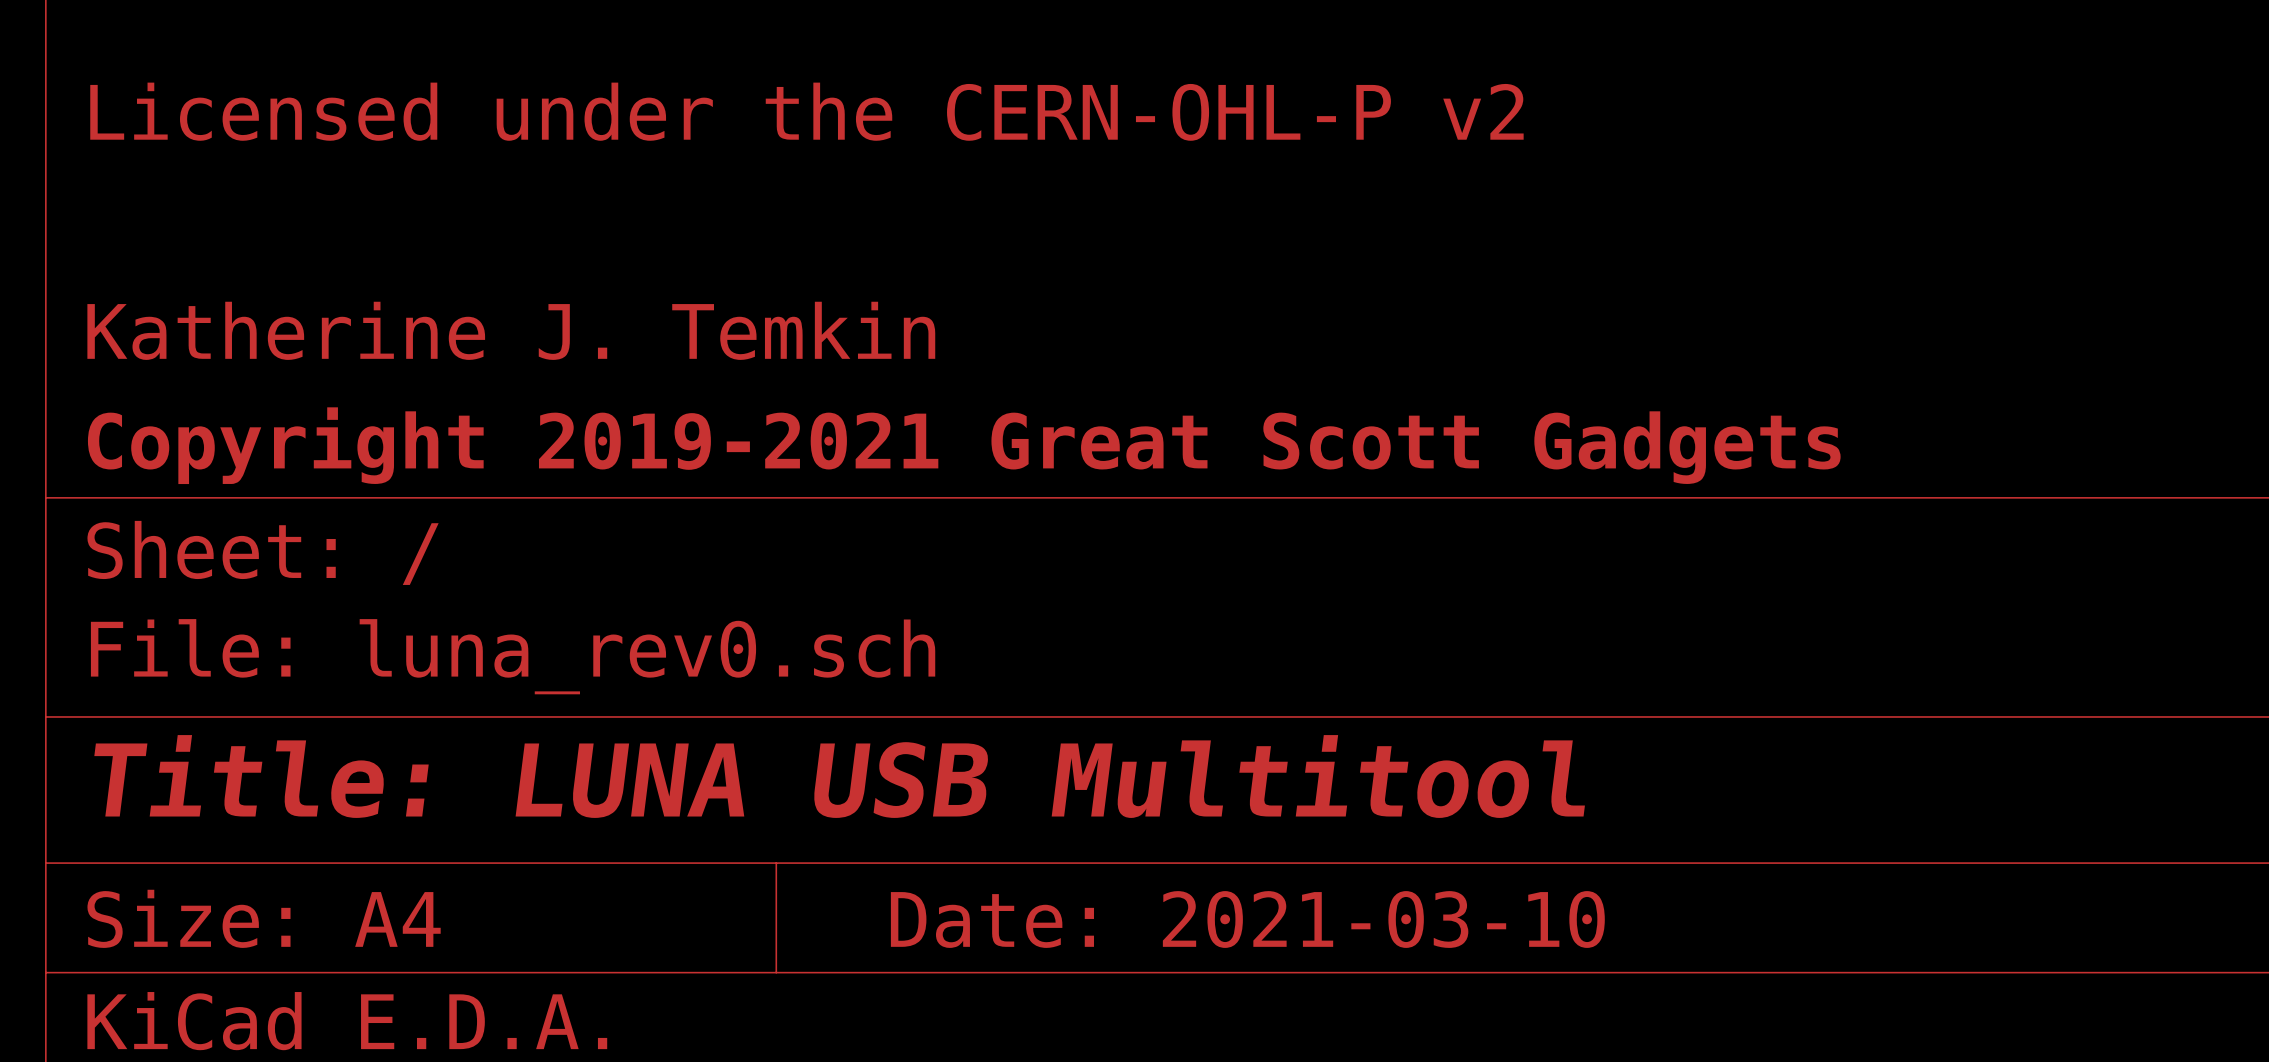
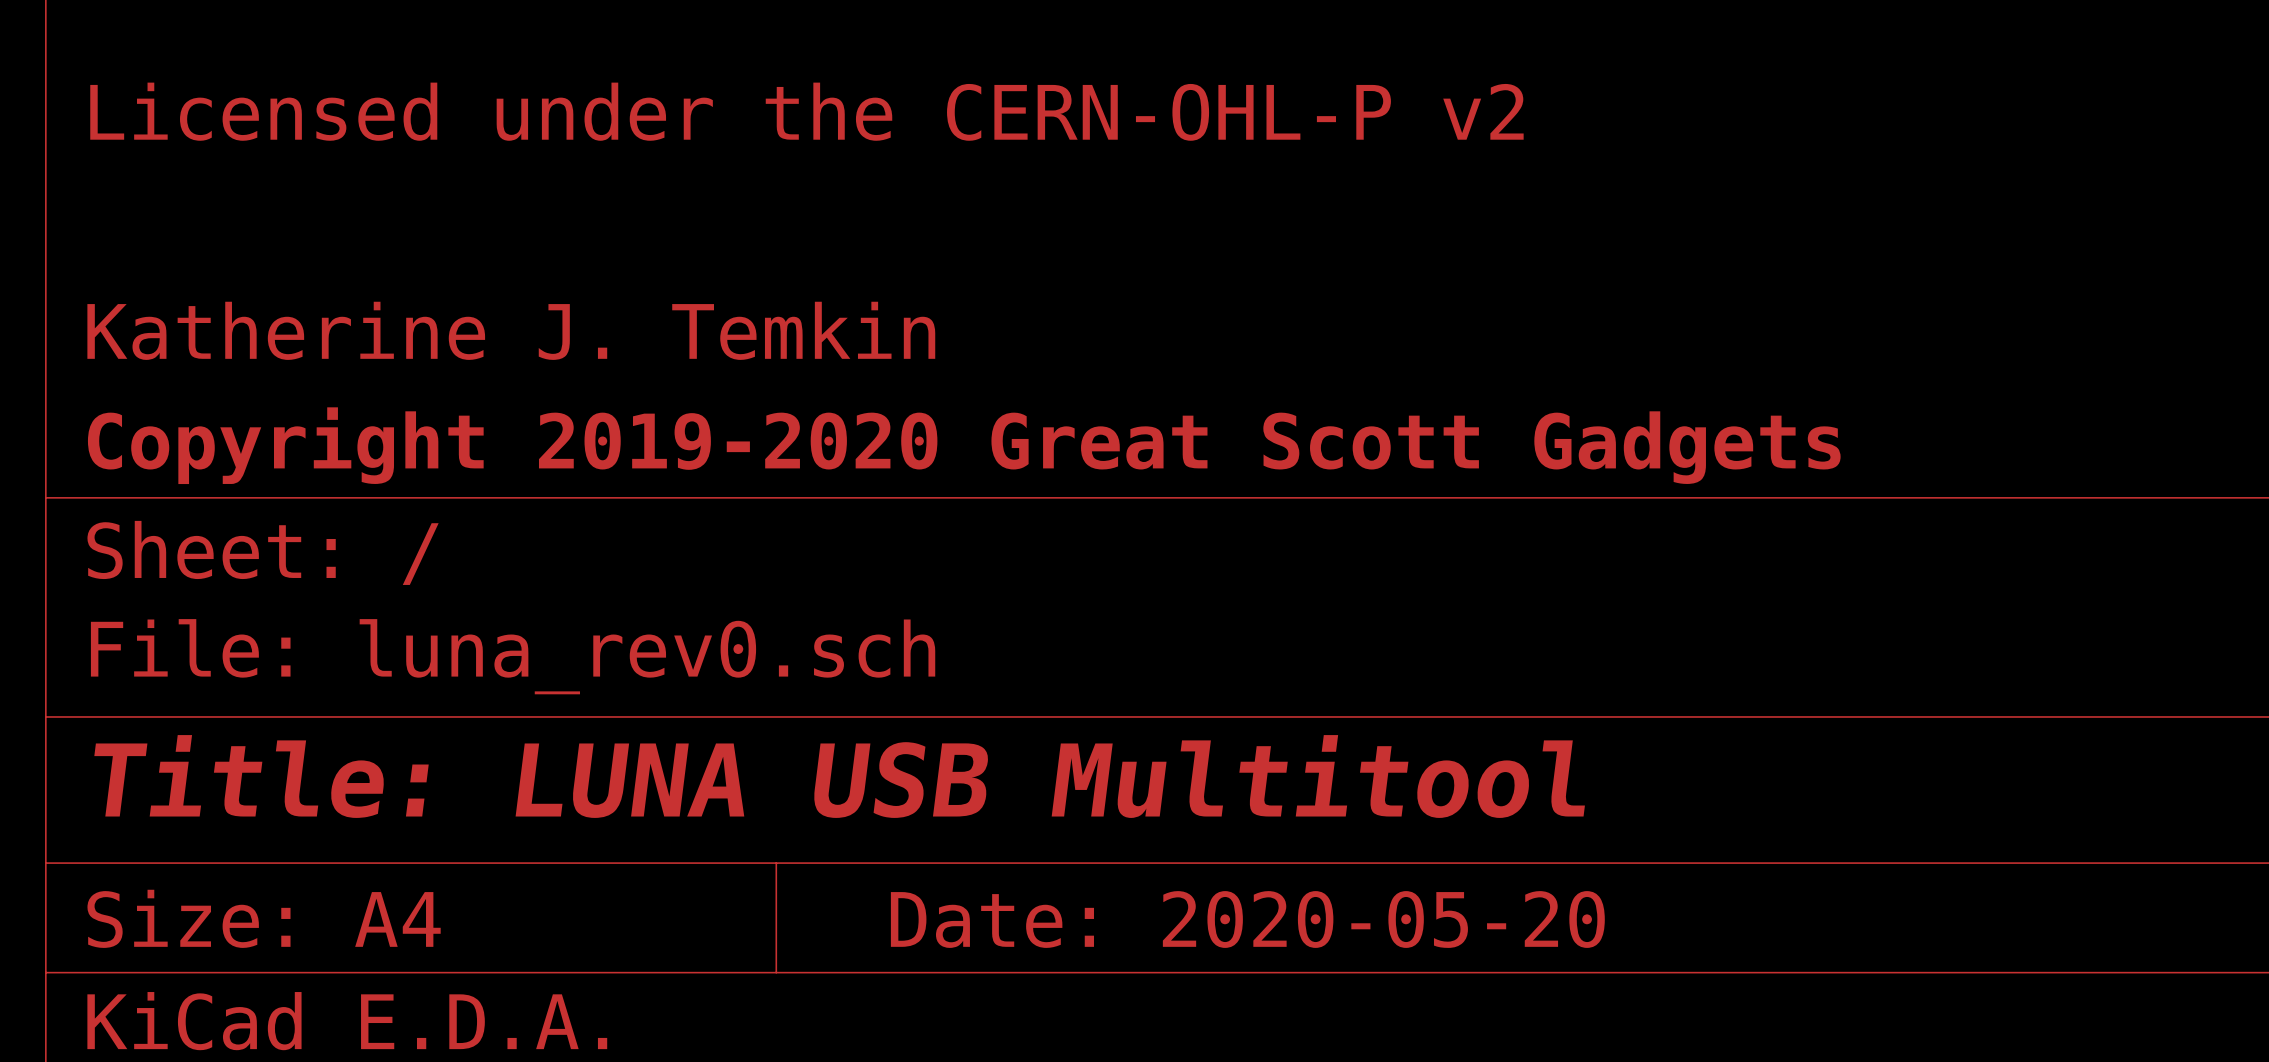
title block: Copyright 2019-2021 Great Scott Gadgets (964, 445) -> Copyright 2019-2020 Great Scott Gadgets (964, 445)
title block: Date: 2021-03-10 (1247, 919) -> Date: 2020-05-20 (1247, 919)

